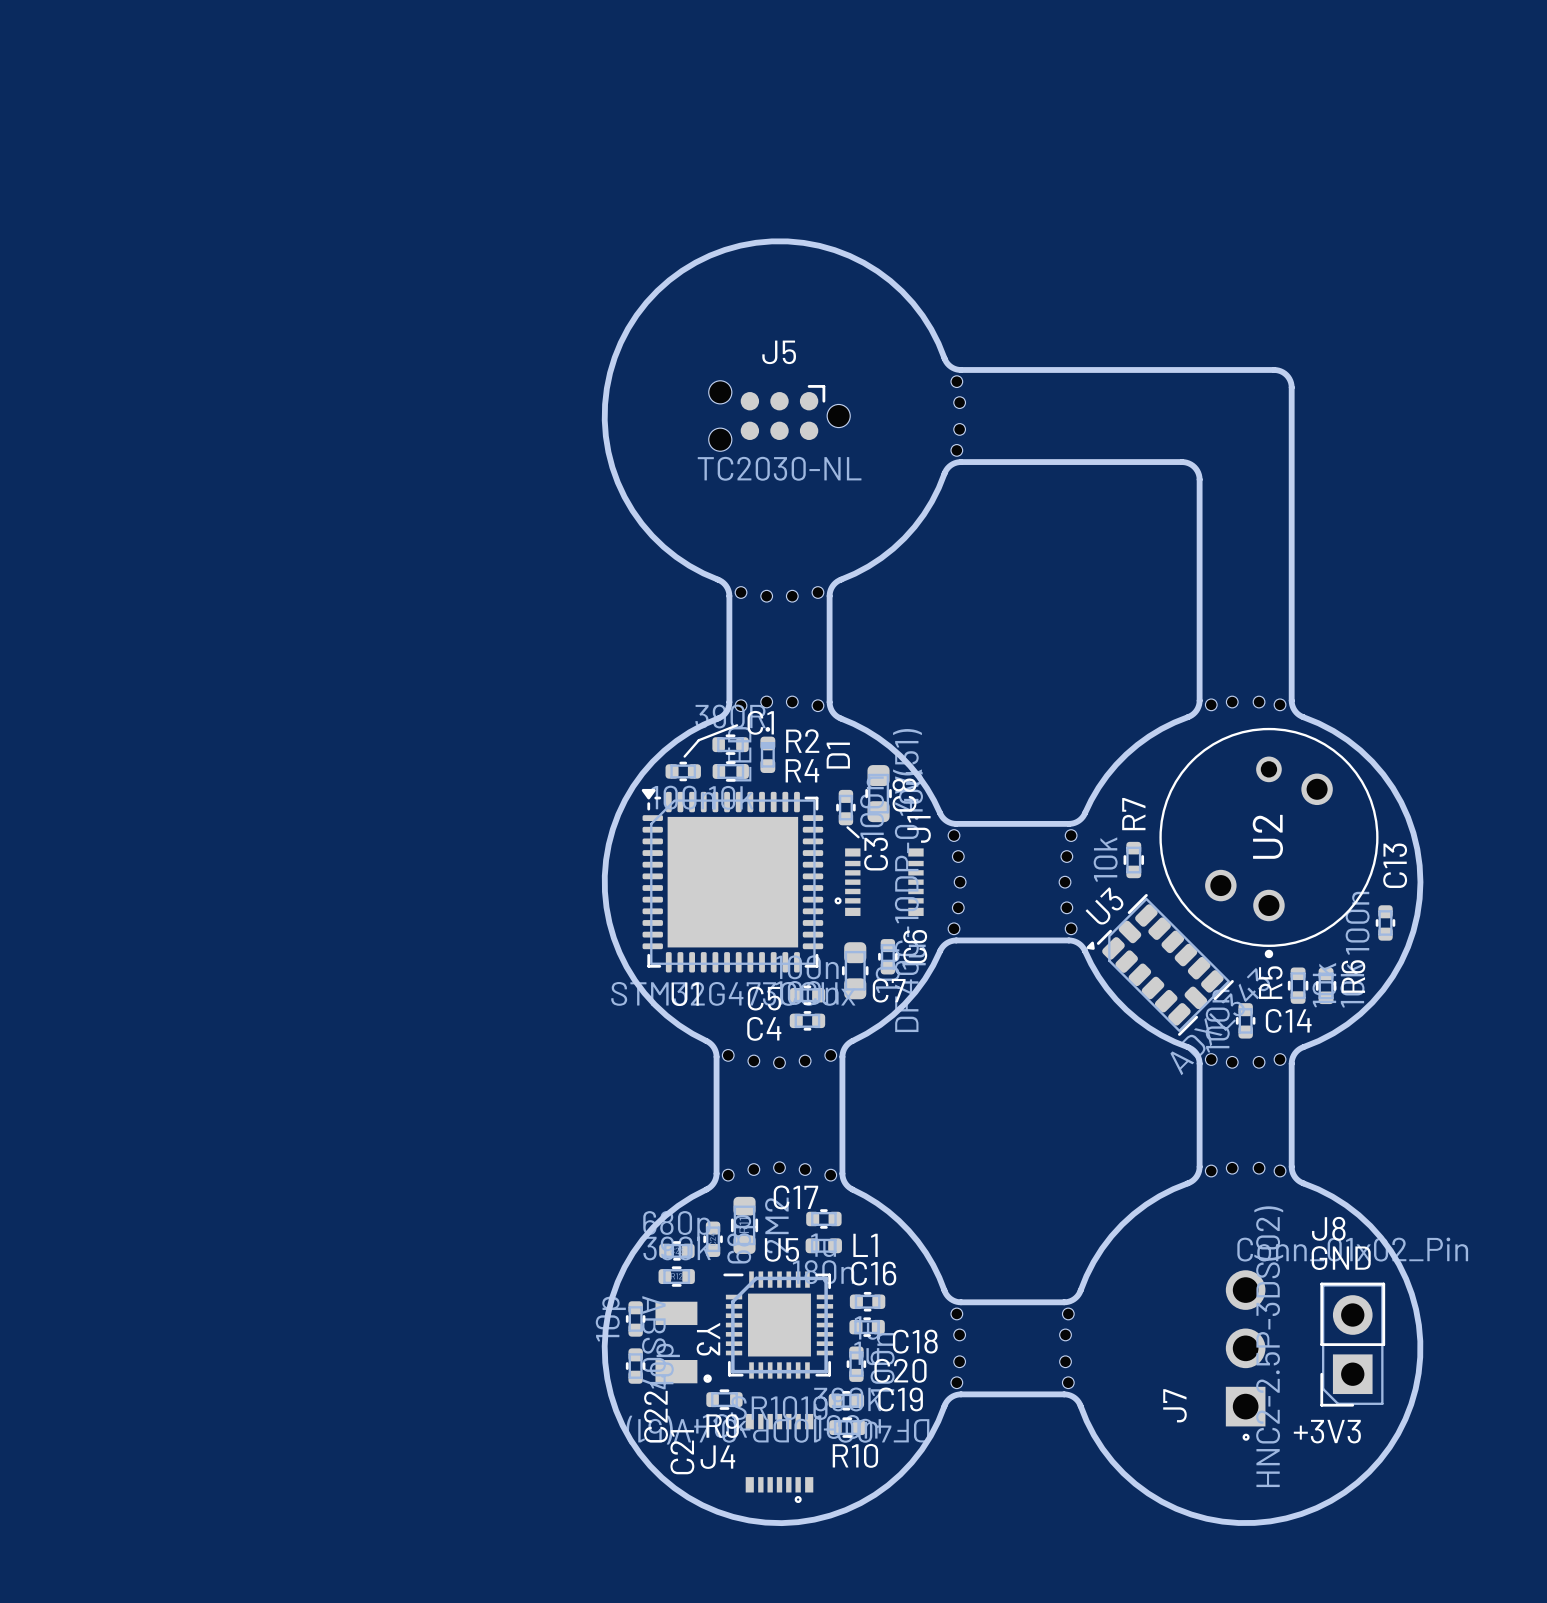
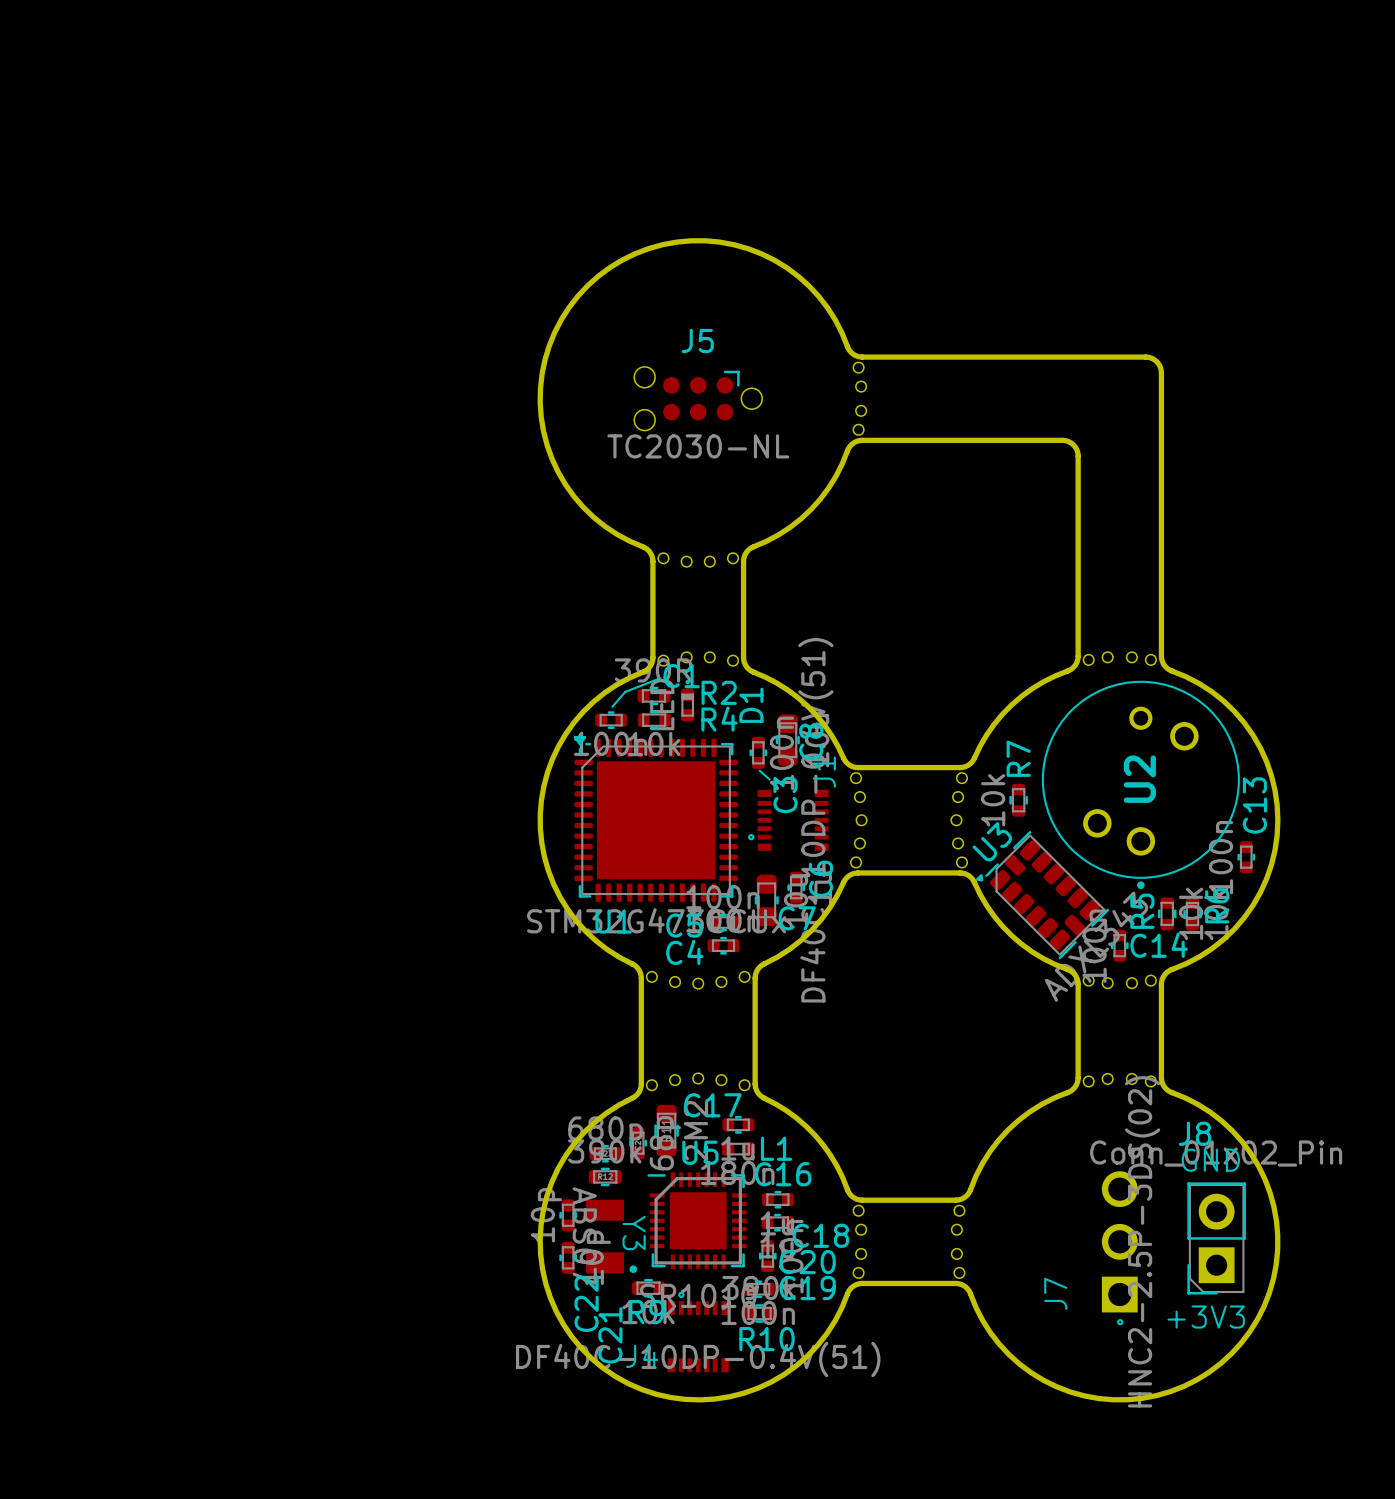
J4 rotation: 0° (779, 1458) -> 180° (698, 1331)

